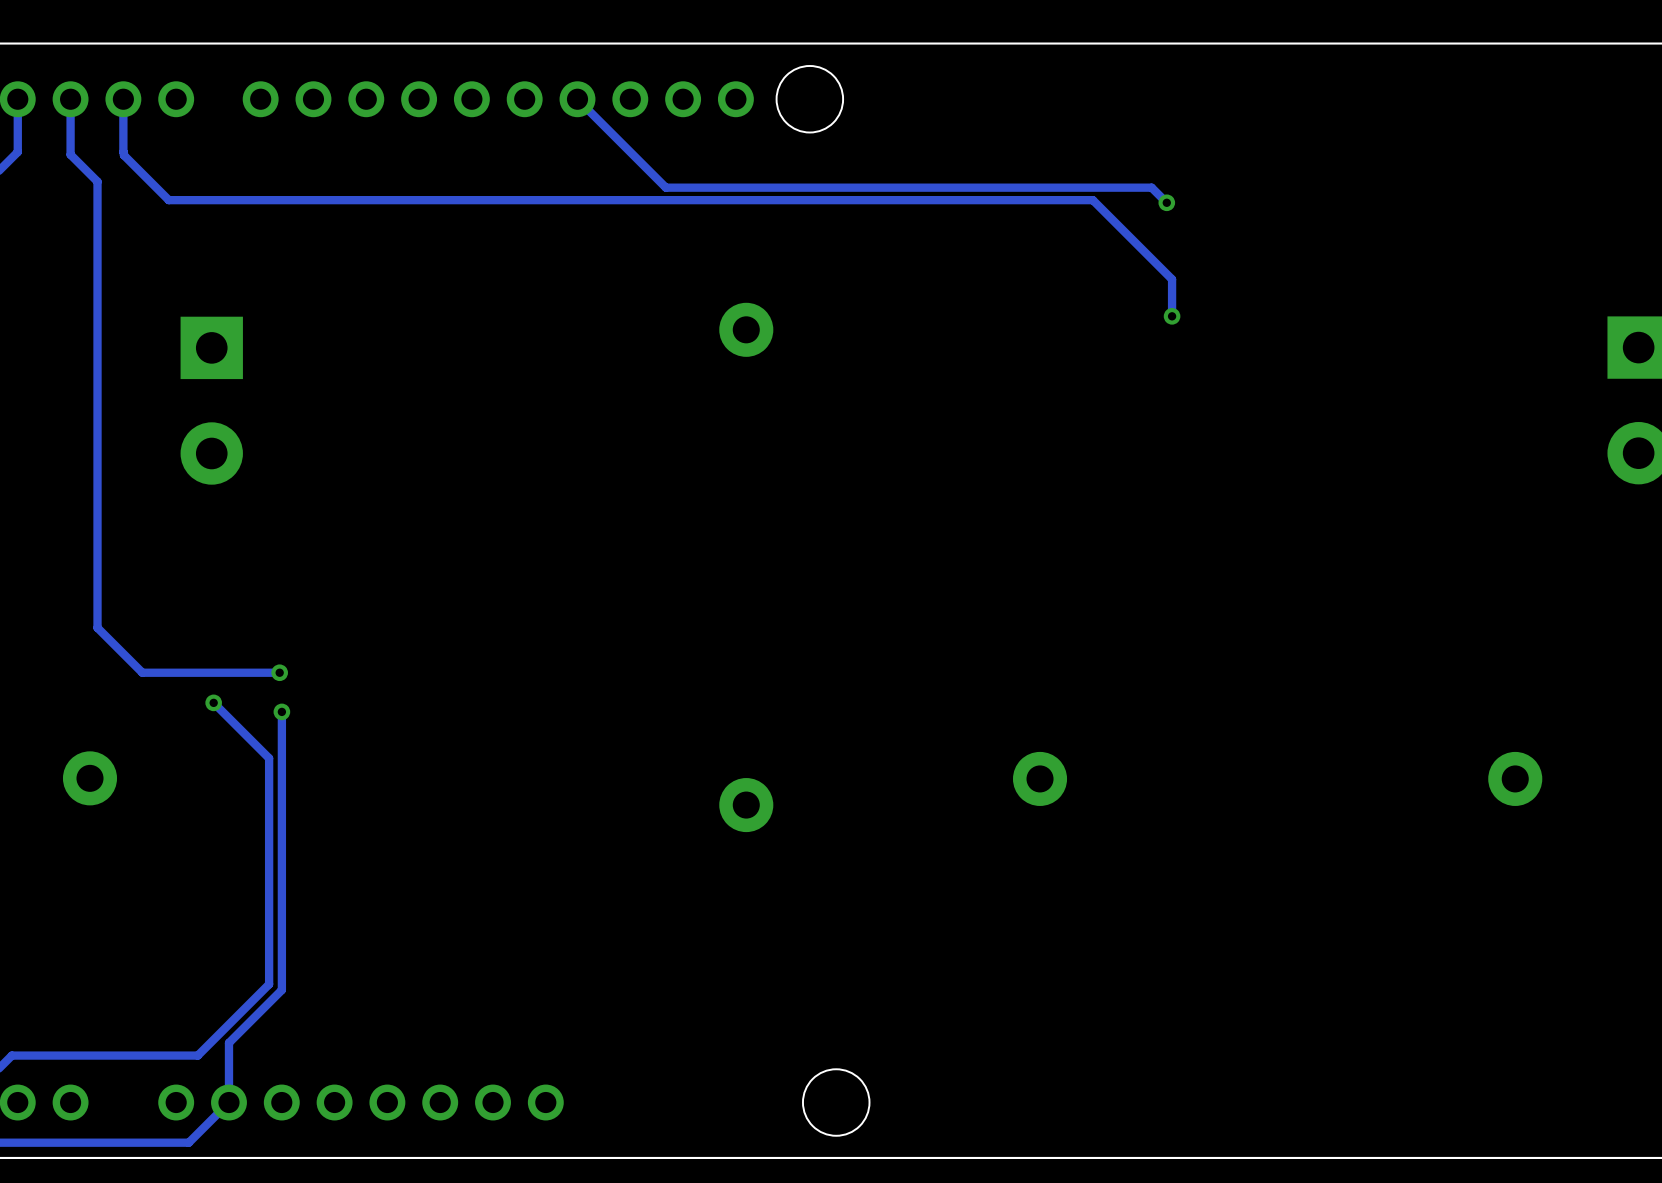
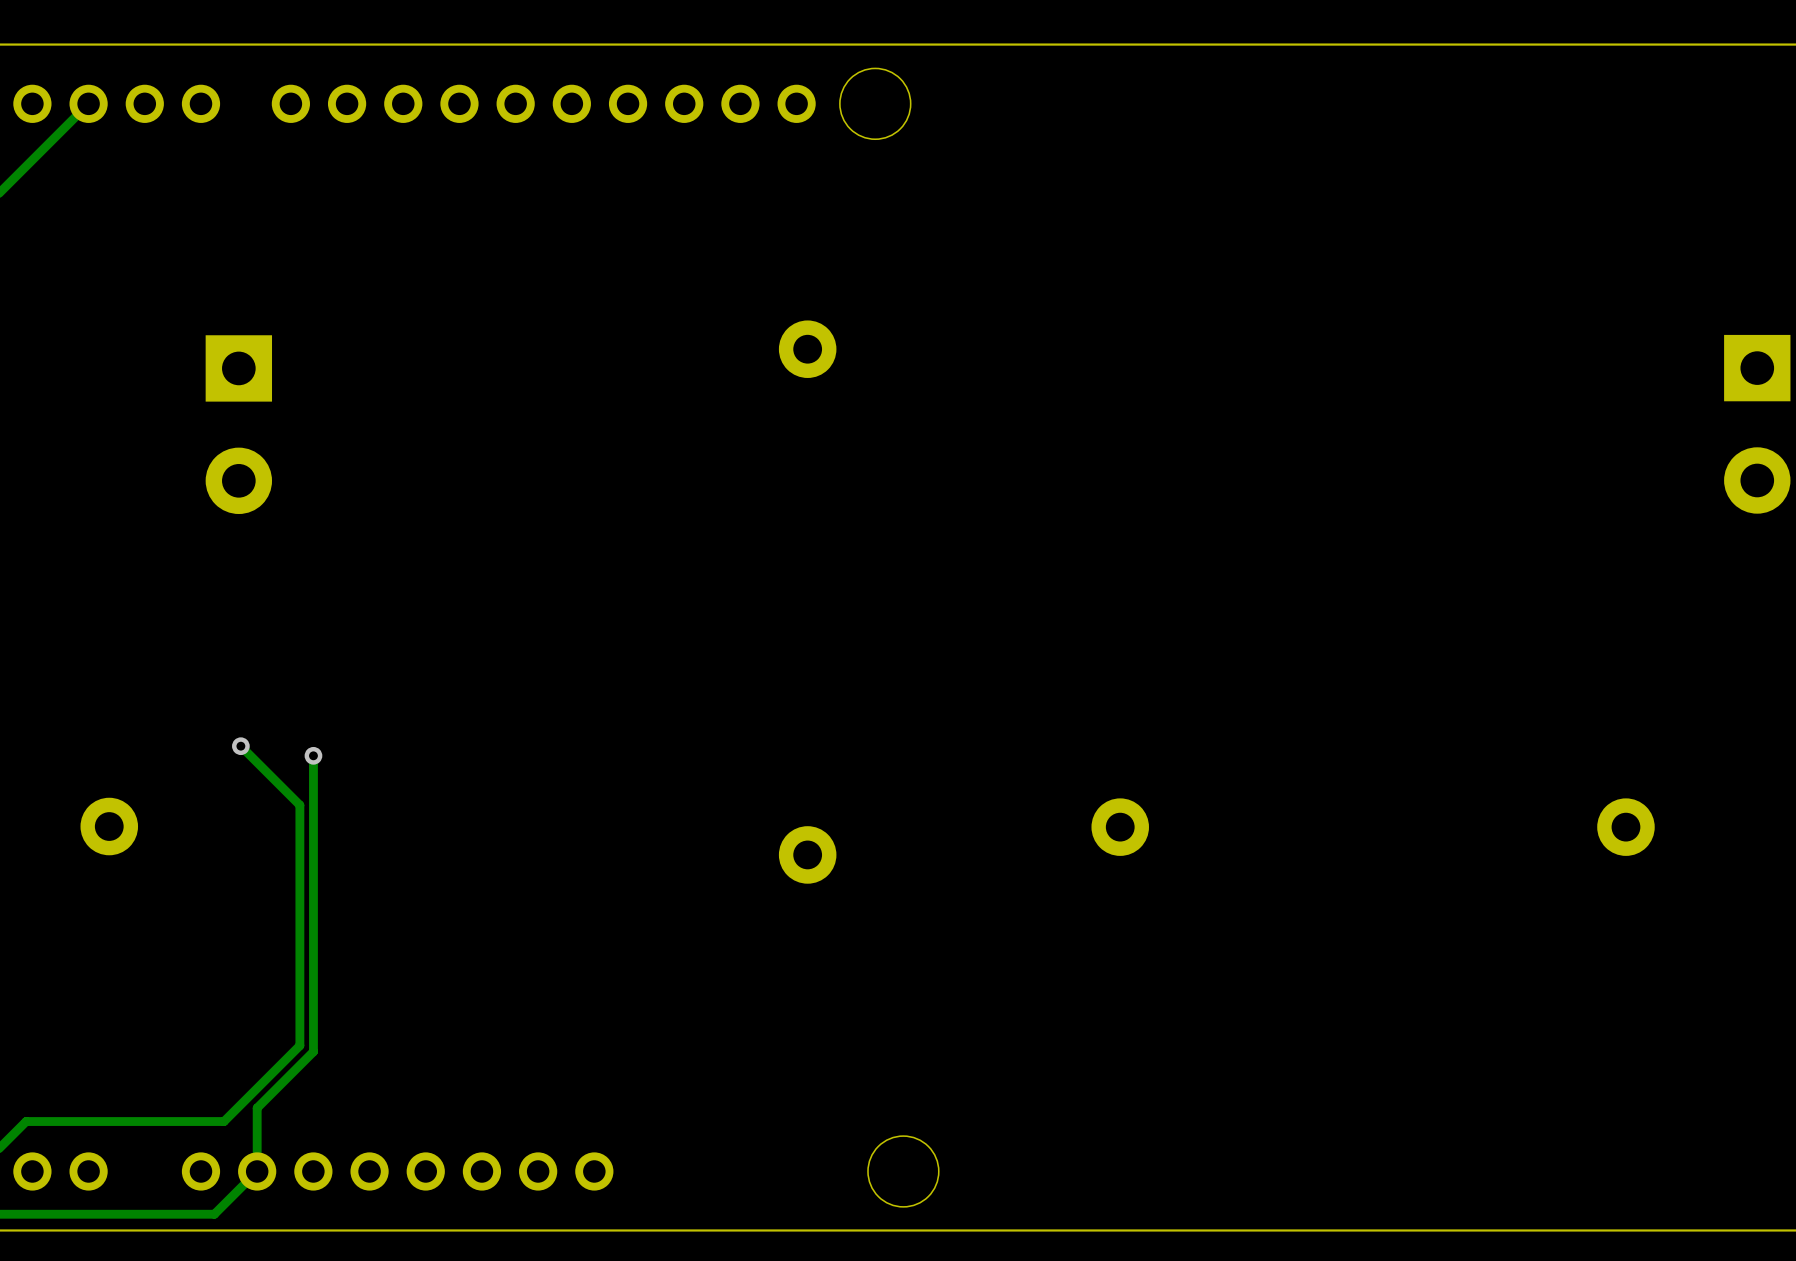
track: (17, 99) (17, 152) -> (88, 103) (32, 160)
track: (70, 99) (70, 154) (97, 181) (97, 627) (142, 672) (279, 672) -> none
track: (123, 99) (123, 155) (168, 200) (1092, 200) (1172, 279) (1172, 316) -> none
track: (577, 99) (665, 187) (1151, 187) (1166, 202) -> none
via: (1166, 202) -> none
via: (1172, 316) -> none
via: (279, 672) -> none

